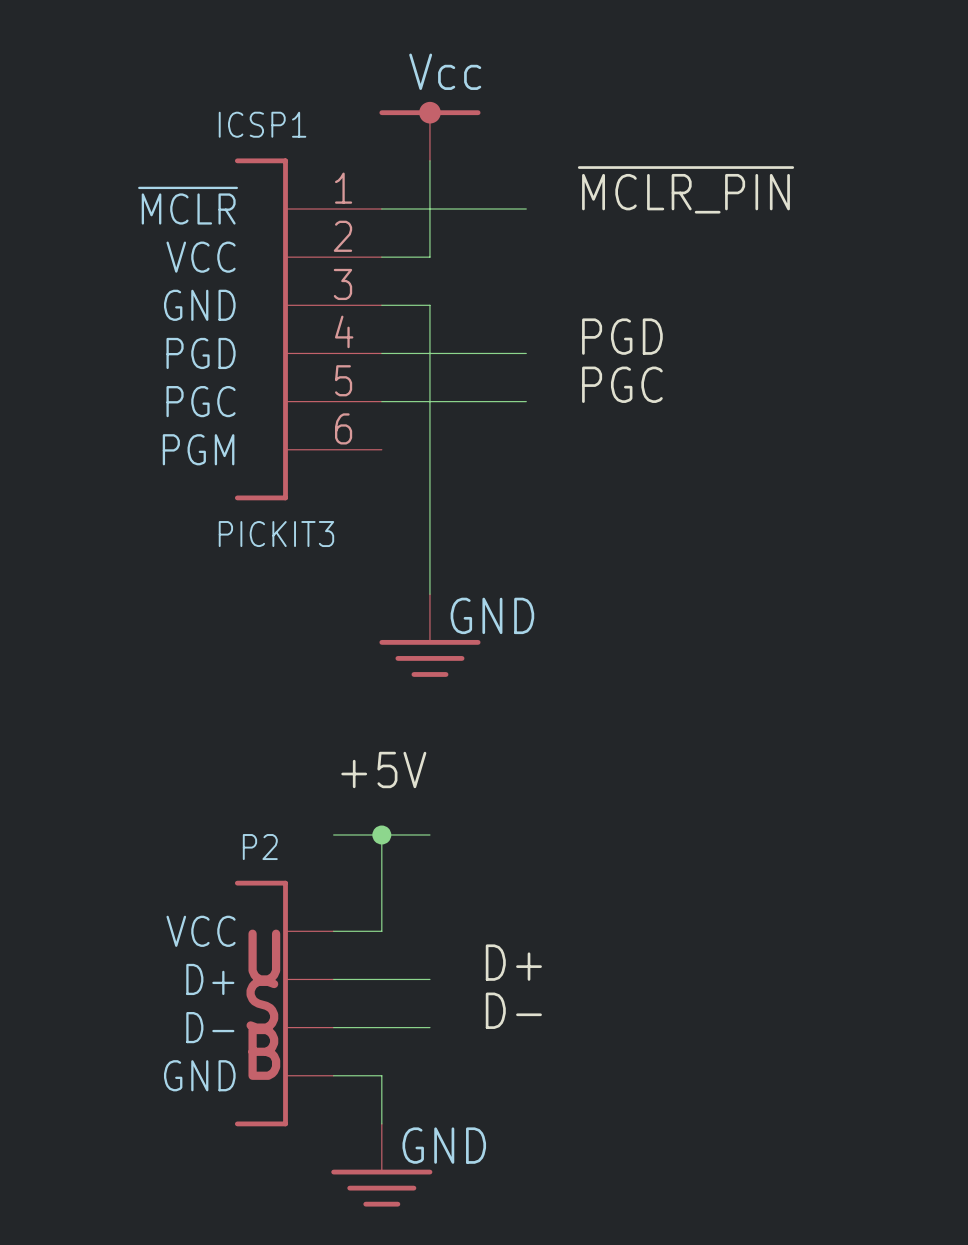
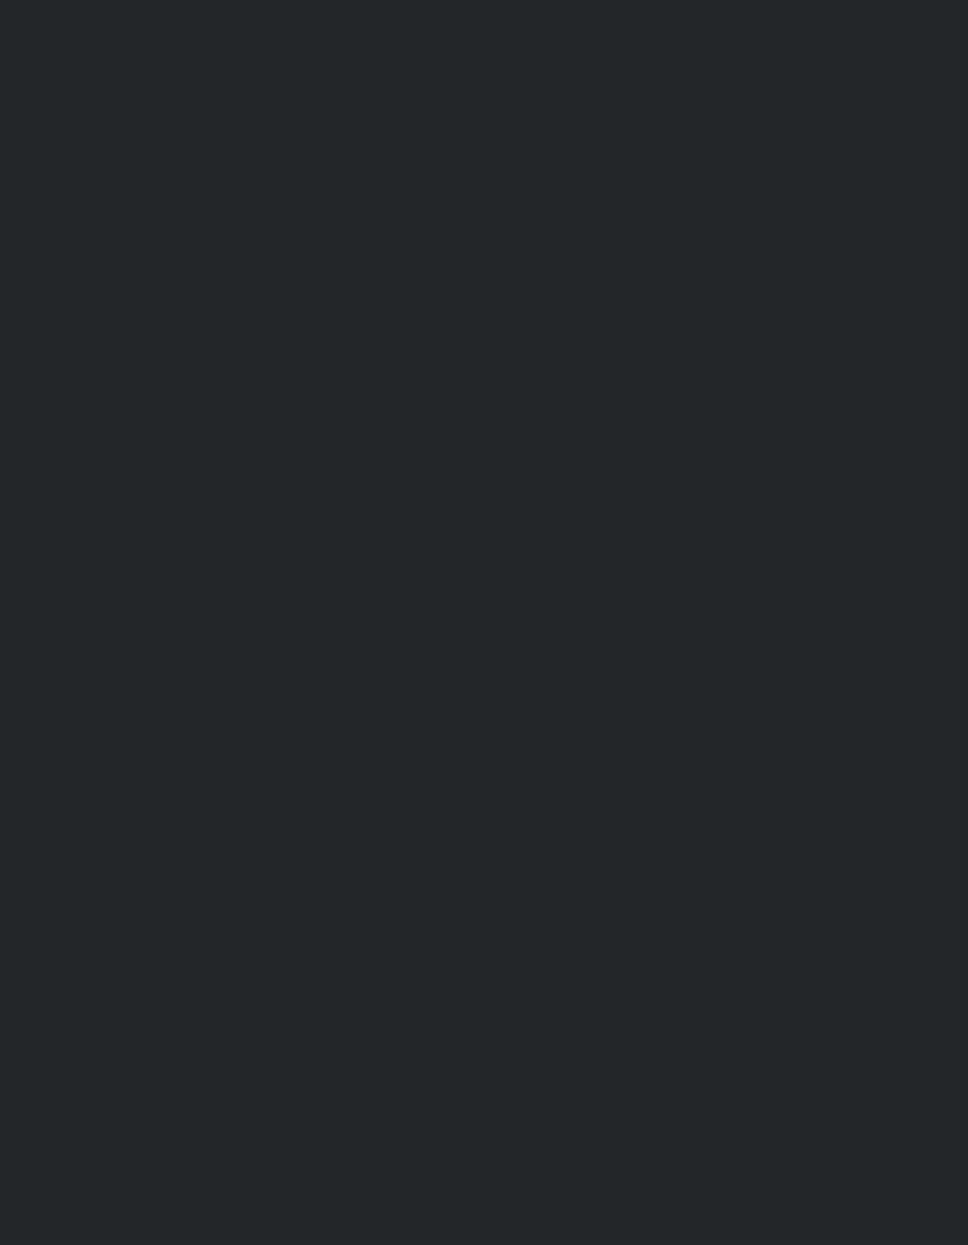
power symbol: (429, 131) -> none
wire: (429, 160) (429, 257) (381, 257) -> none
label: ~{MCLR_PIN} (685, 189) -> none
wire: (381, 208) (526, 208) -> none
wire: (381, 305) (429, 305) (429, 594) -> none
ICSP1: PICKIT3 (308, 329) -> none
label: PGD (622, 336) -> none
wire: (381, 353) (526, 353) -> none
label: PGC (622, 384) -> none
wire: (381, 401) (526, 401) -> none
power symbol: (429, 635) -> none
label: +5V (383, 769) -> none
wire: (333, 834) (429, 834) -> none
wire: (381, 834) (381, 931) (333, 931) -> none
junction: (381, 834) -> none
label: D+ (513, 962) -> none
wire: (333, 979) (429, 979) -> none
P2: (284, 1003) -> none
label: D- (513, 1010) -> none
wire: (333, 1027) (429, 1027) -> none
wire: (333, 1075) (381, 1075) (381, 1123) -> none
power symbol: (381, 1165) -> none

